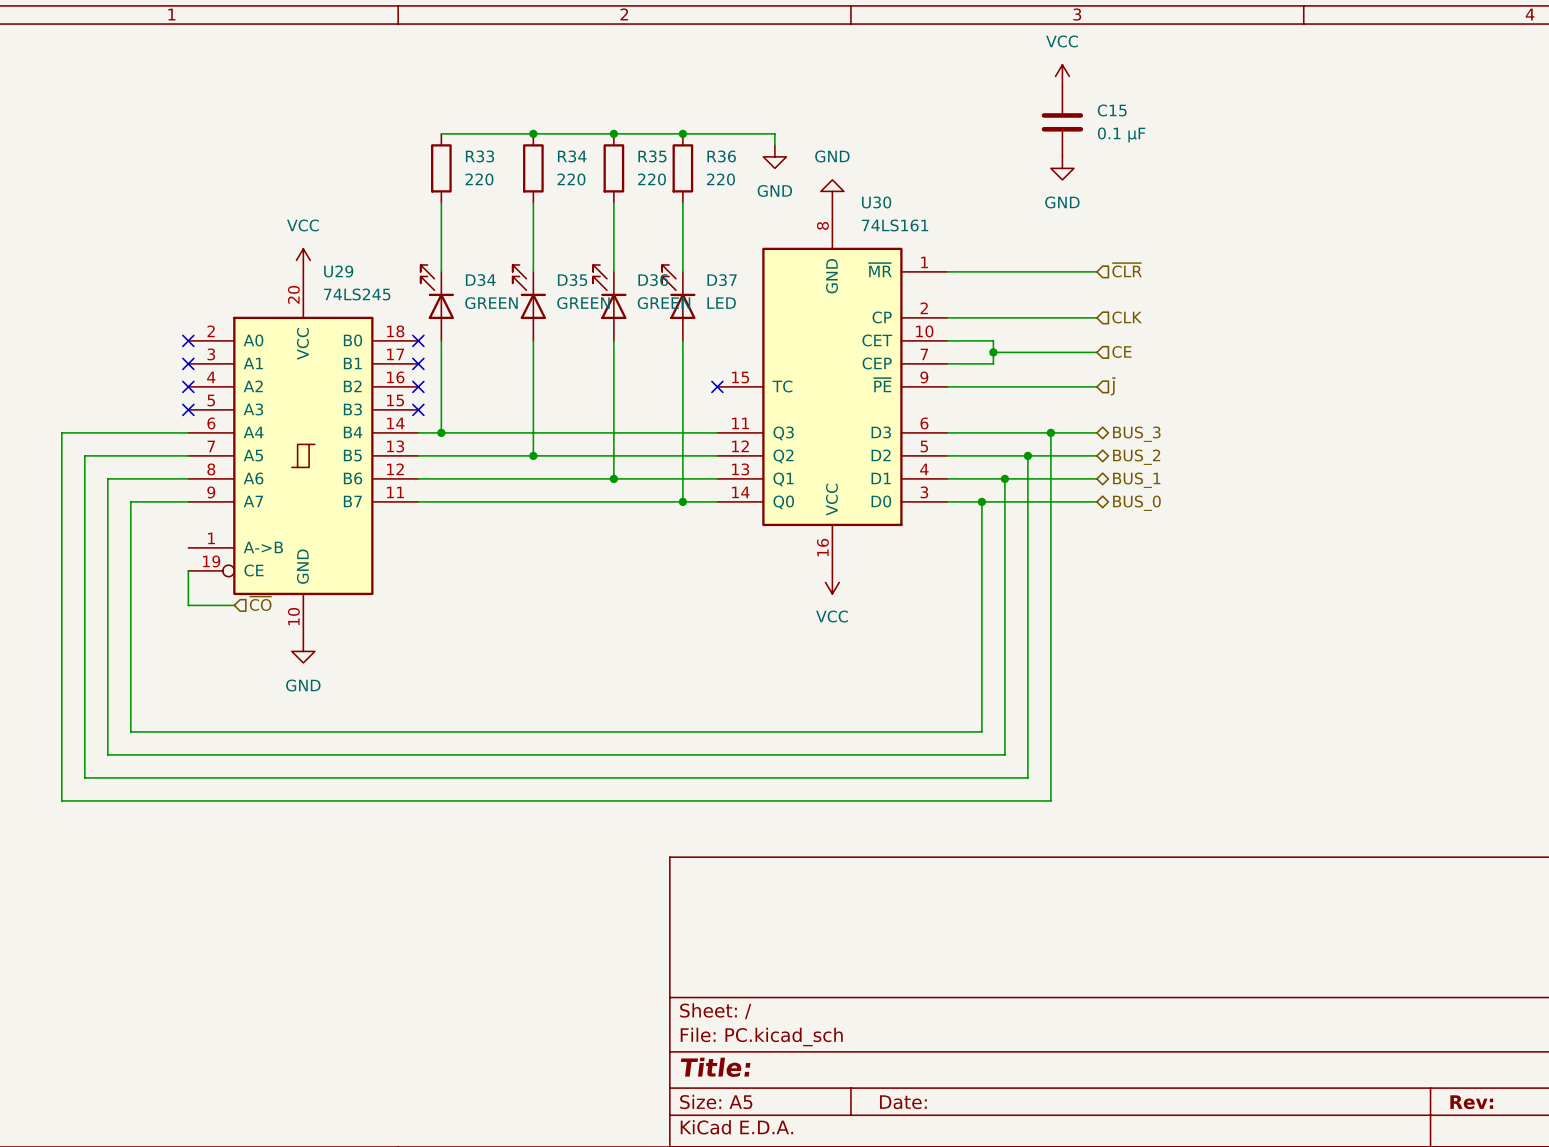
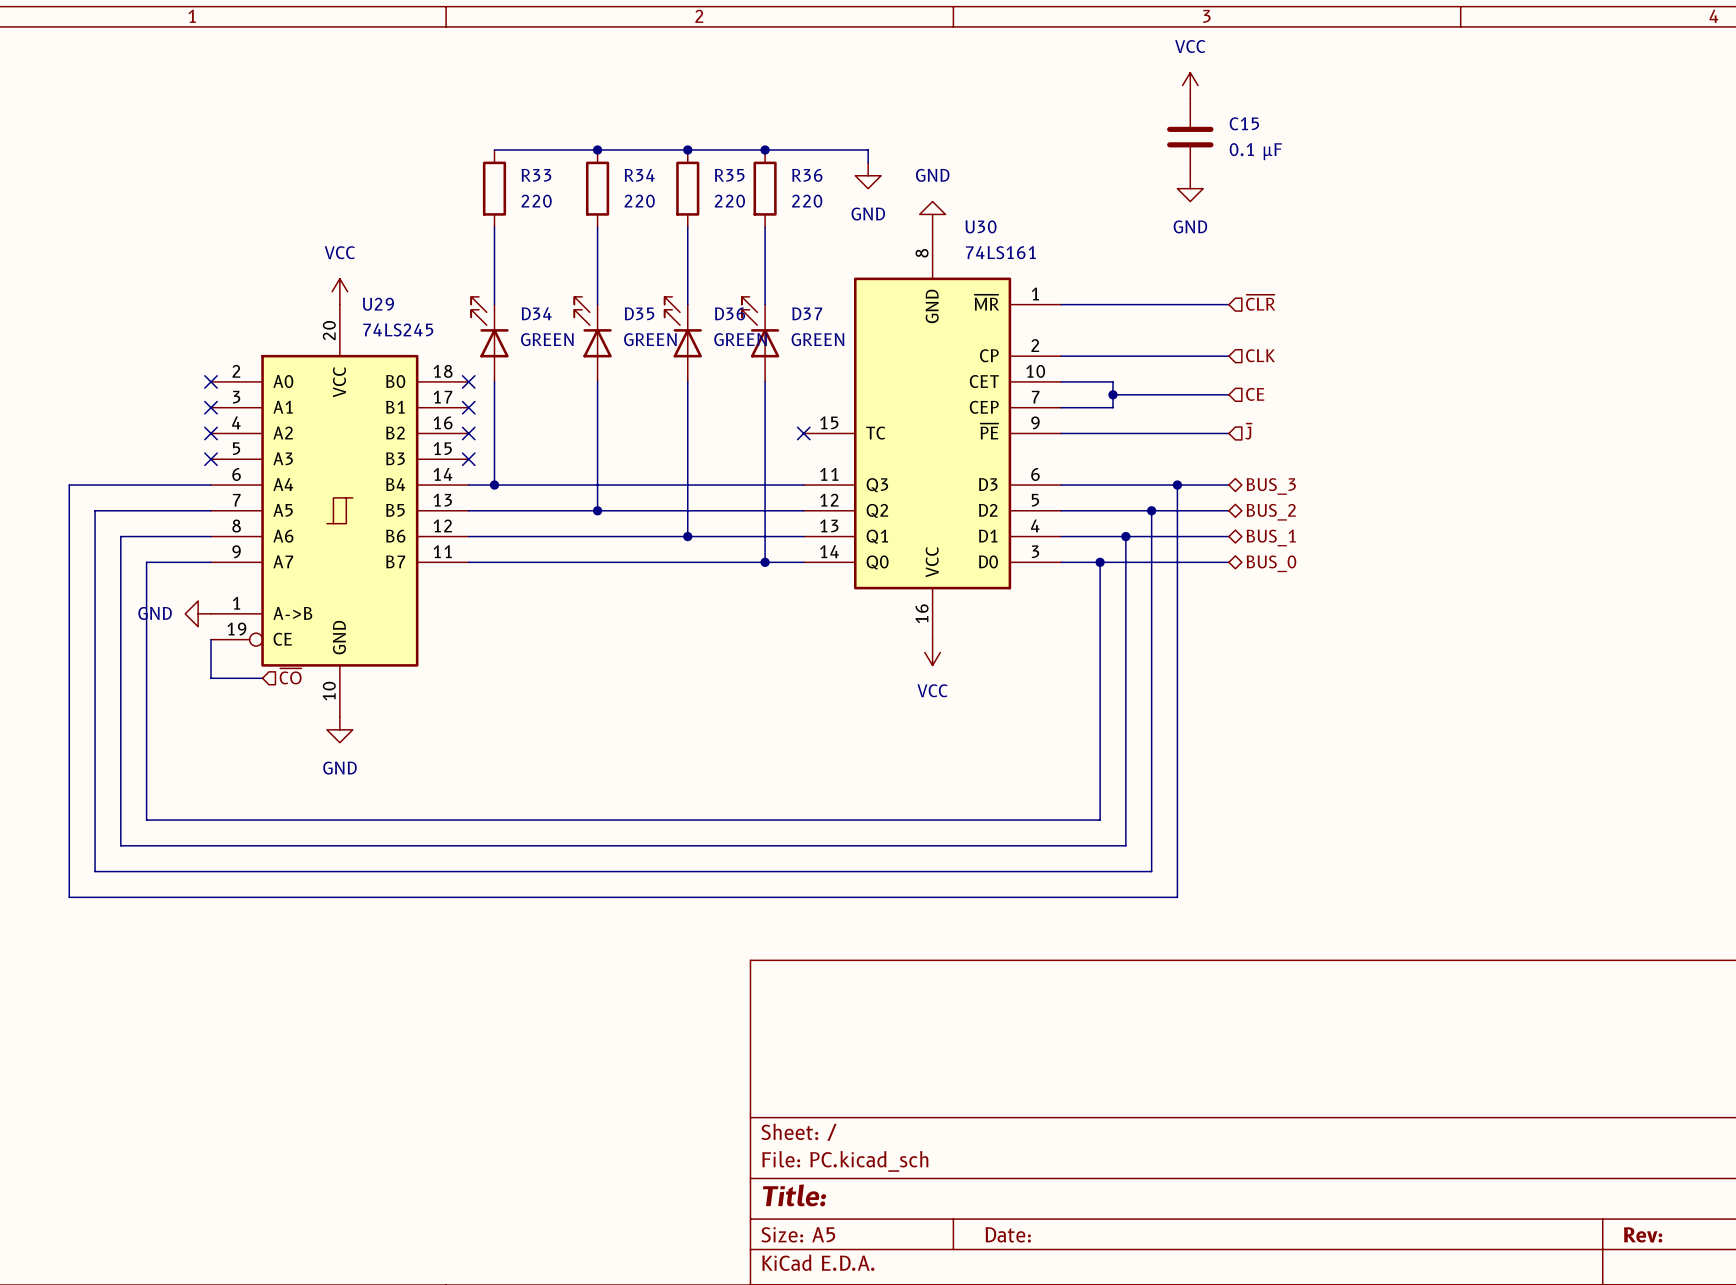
D37 value: LED (721, 303) -> GREEN (817, 339)
power symbol: none -> GND (198, 613)

